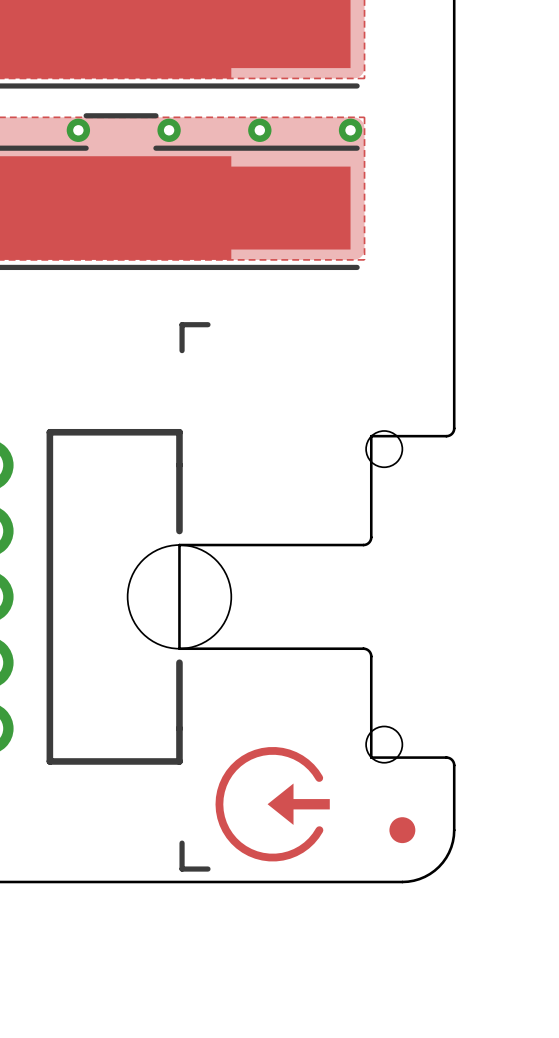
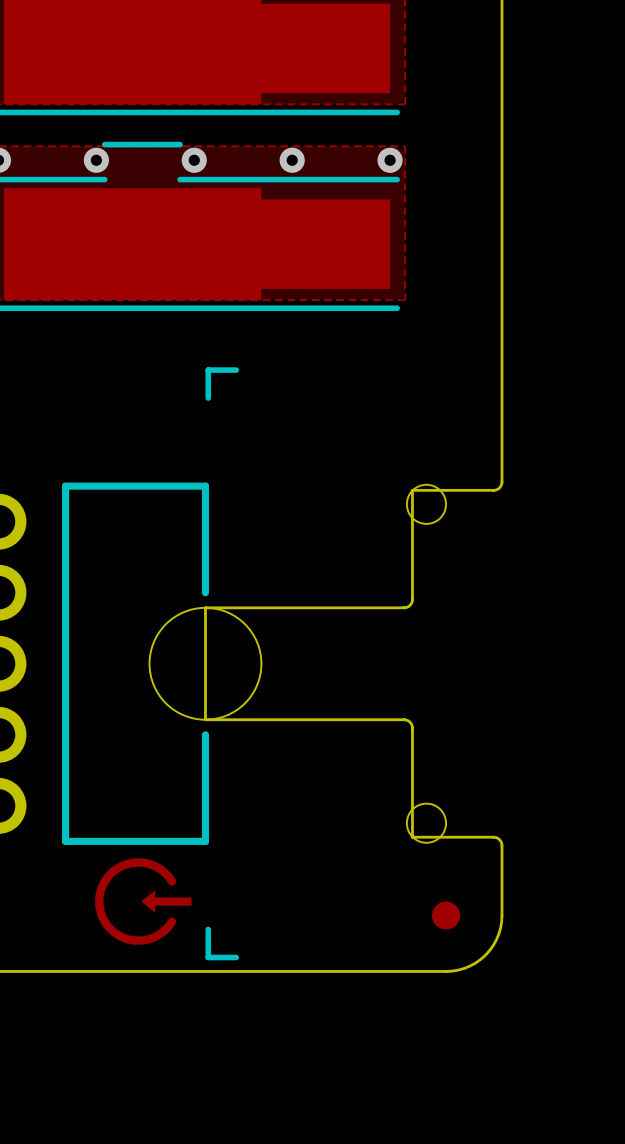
drawing: [215, 747, 330, 862] -> none
drawing: none -> [95, 858, 192, 945]

